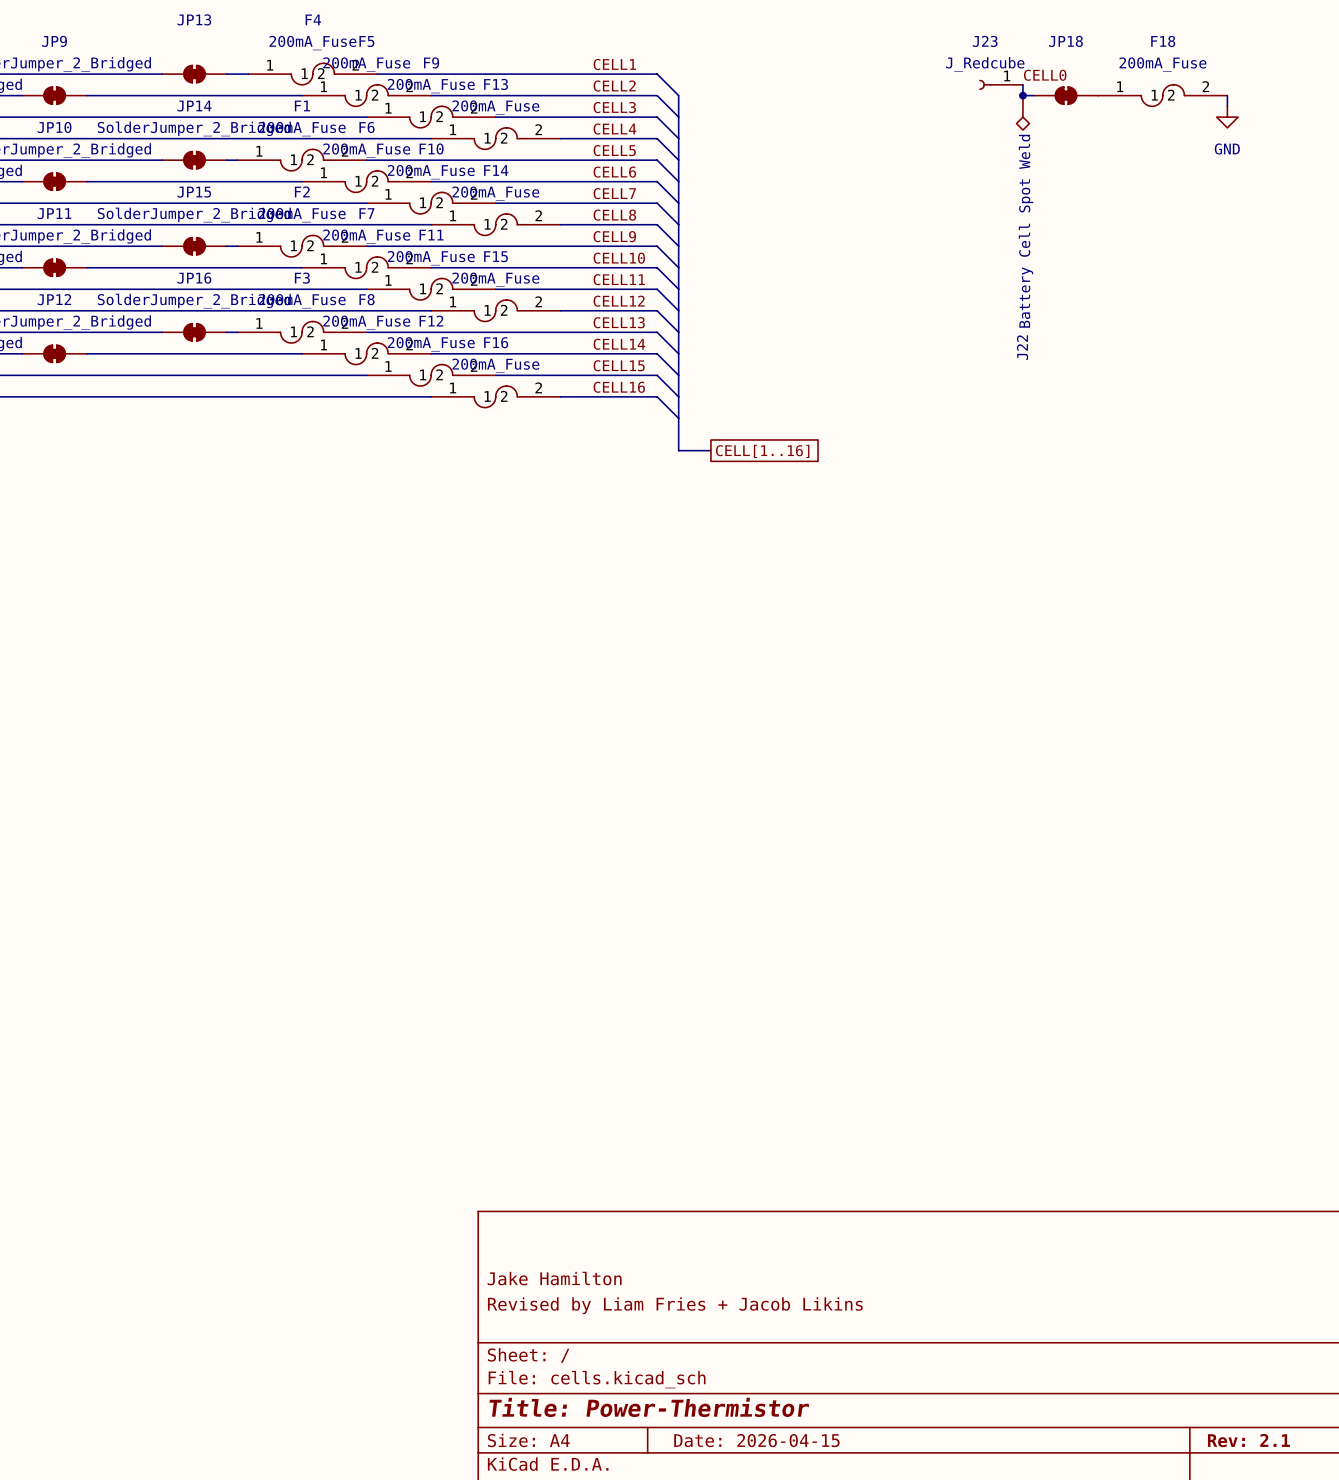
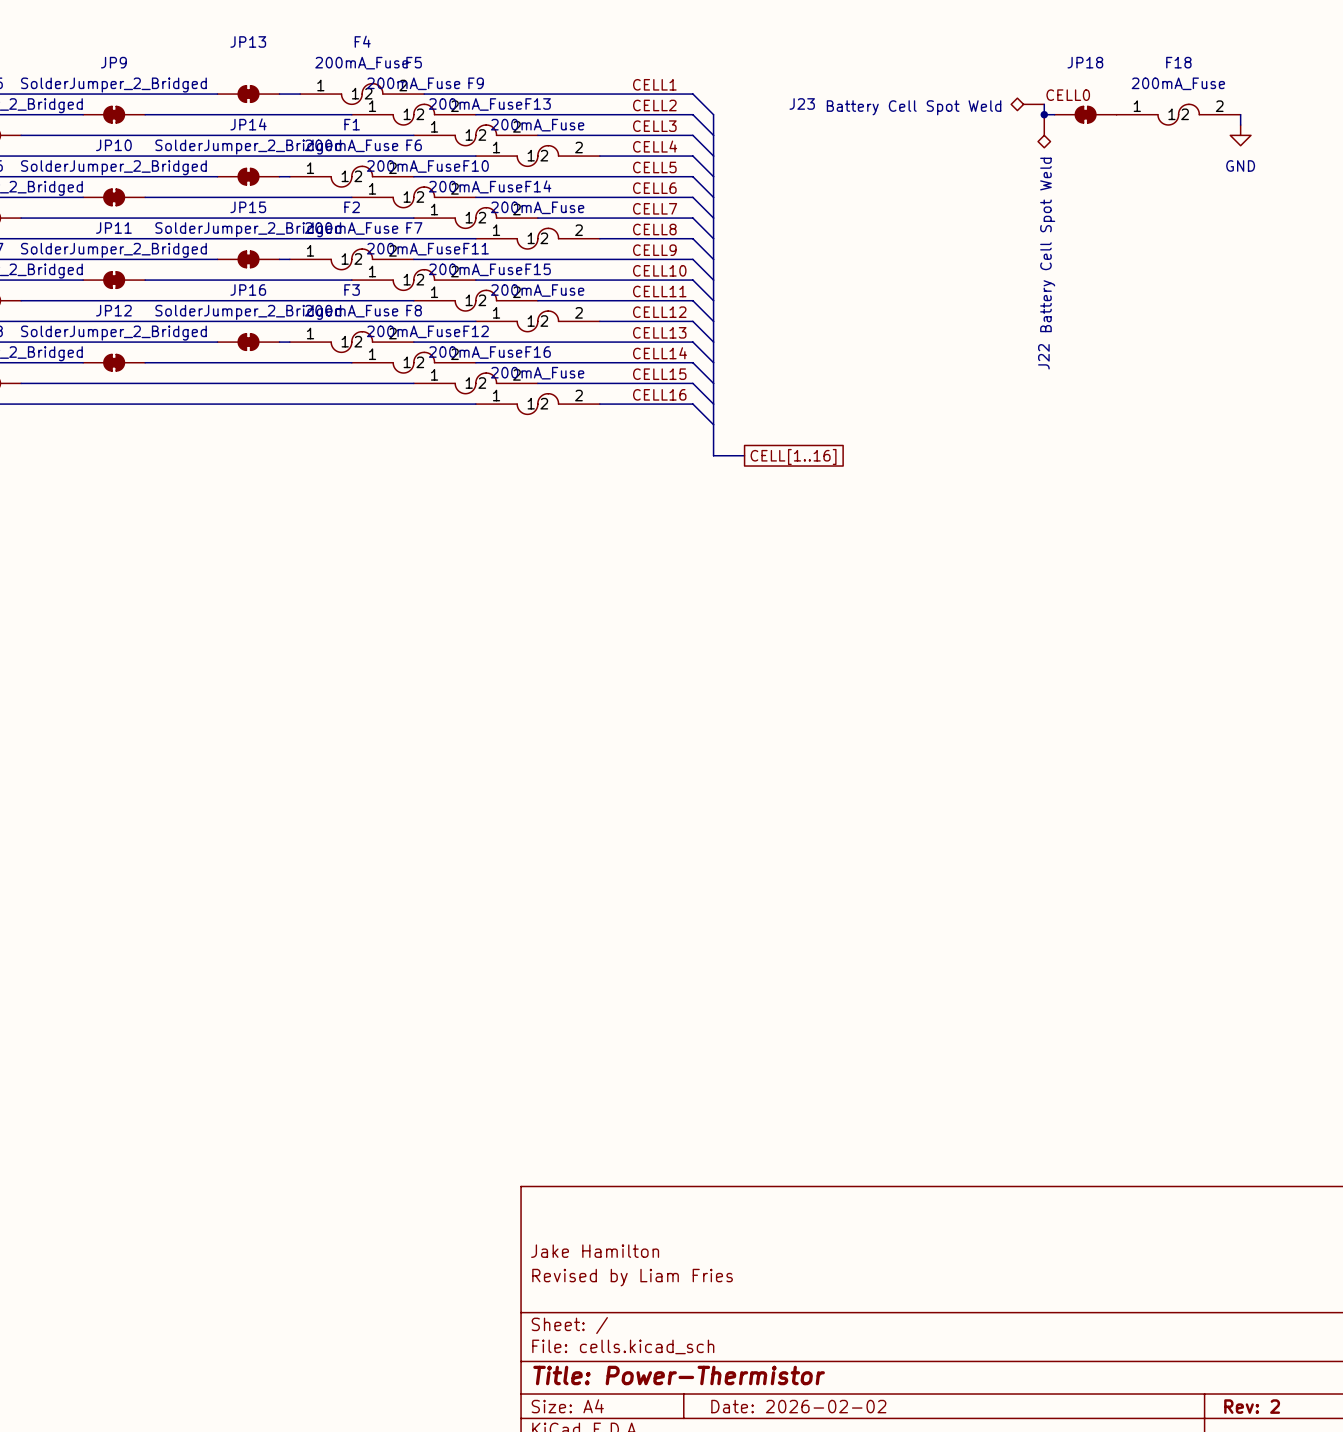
J23 name position: J23 (985, 41) -> J23 (802, 103)
J23 value: J_Redcube (985, 64) -> Battery Cell Spot Weld (914, 107)
J23 symbol: [979, 79, 1023, 90] -> [1011, 98, 1045, 111]
title block: Revised by Liam Fries + Jacob Likins (675, 1305) -> Revised by Liam Fries (632, 1277)
title block: Date: 2026-04-15 (756, 1440) -> Date: 2026-02-02 (798, 1406)
title block: Rev: 2.1 (1248, 1440) -> Rev: 2 (1252, 1406)

